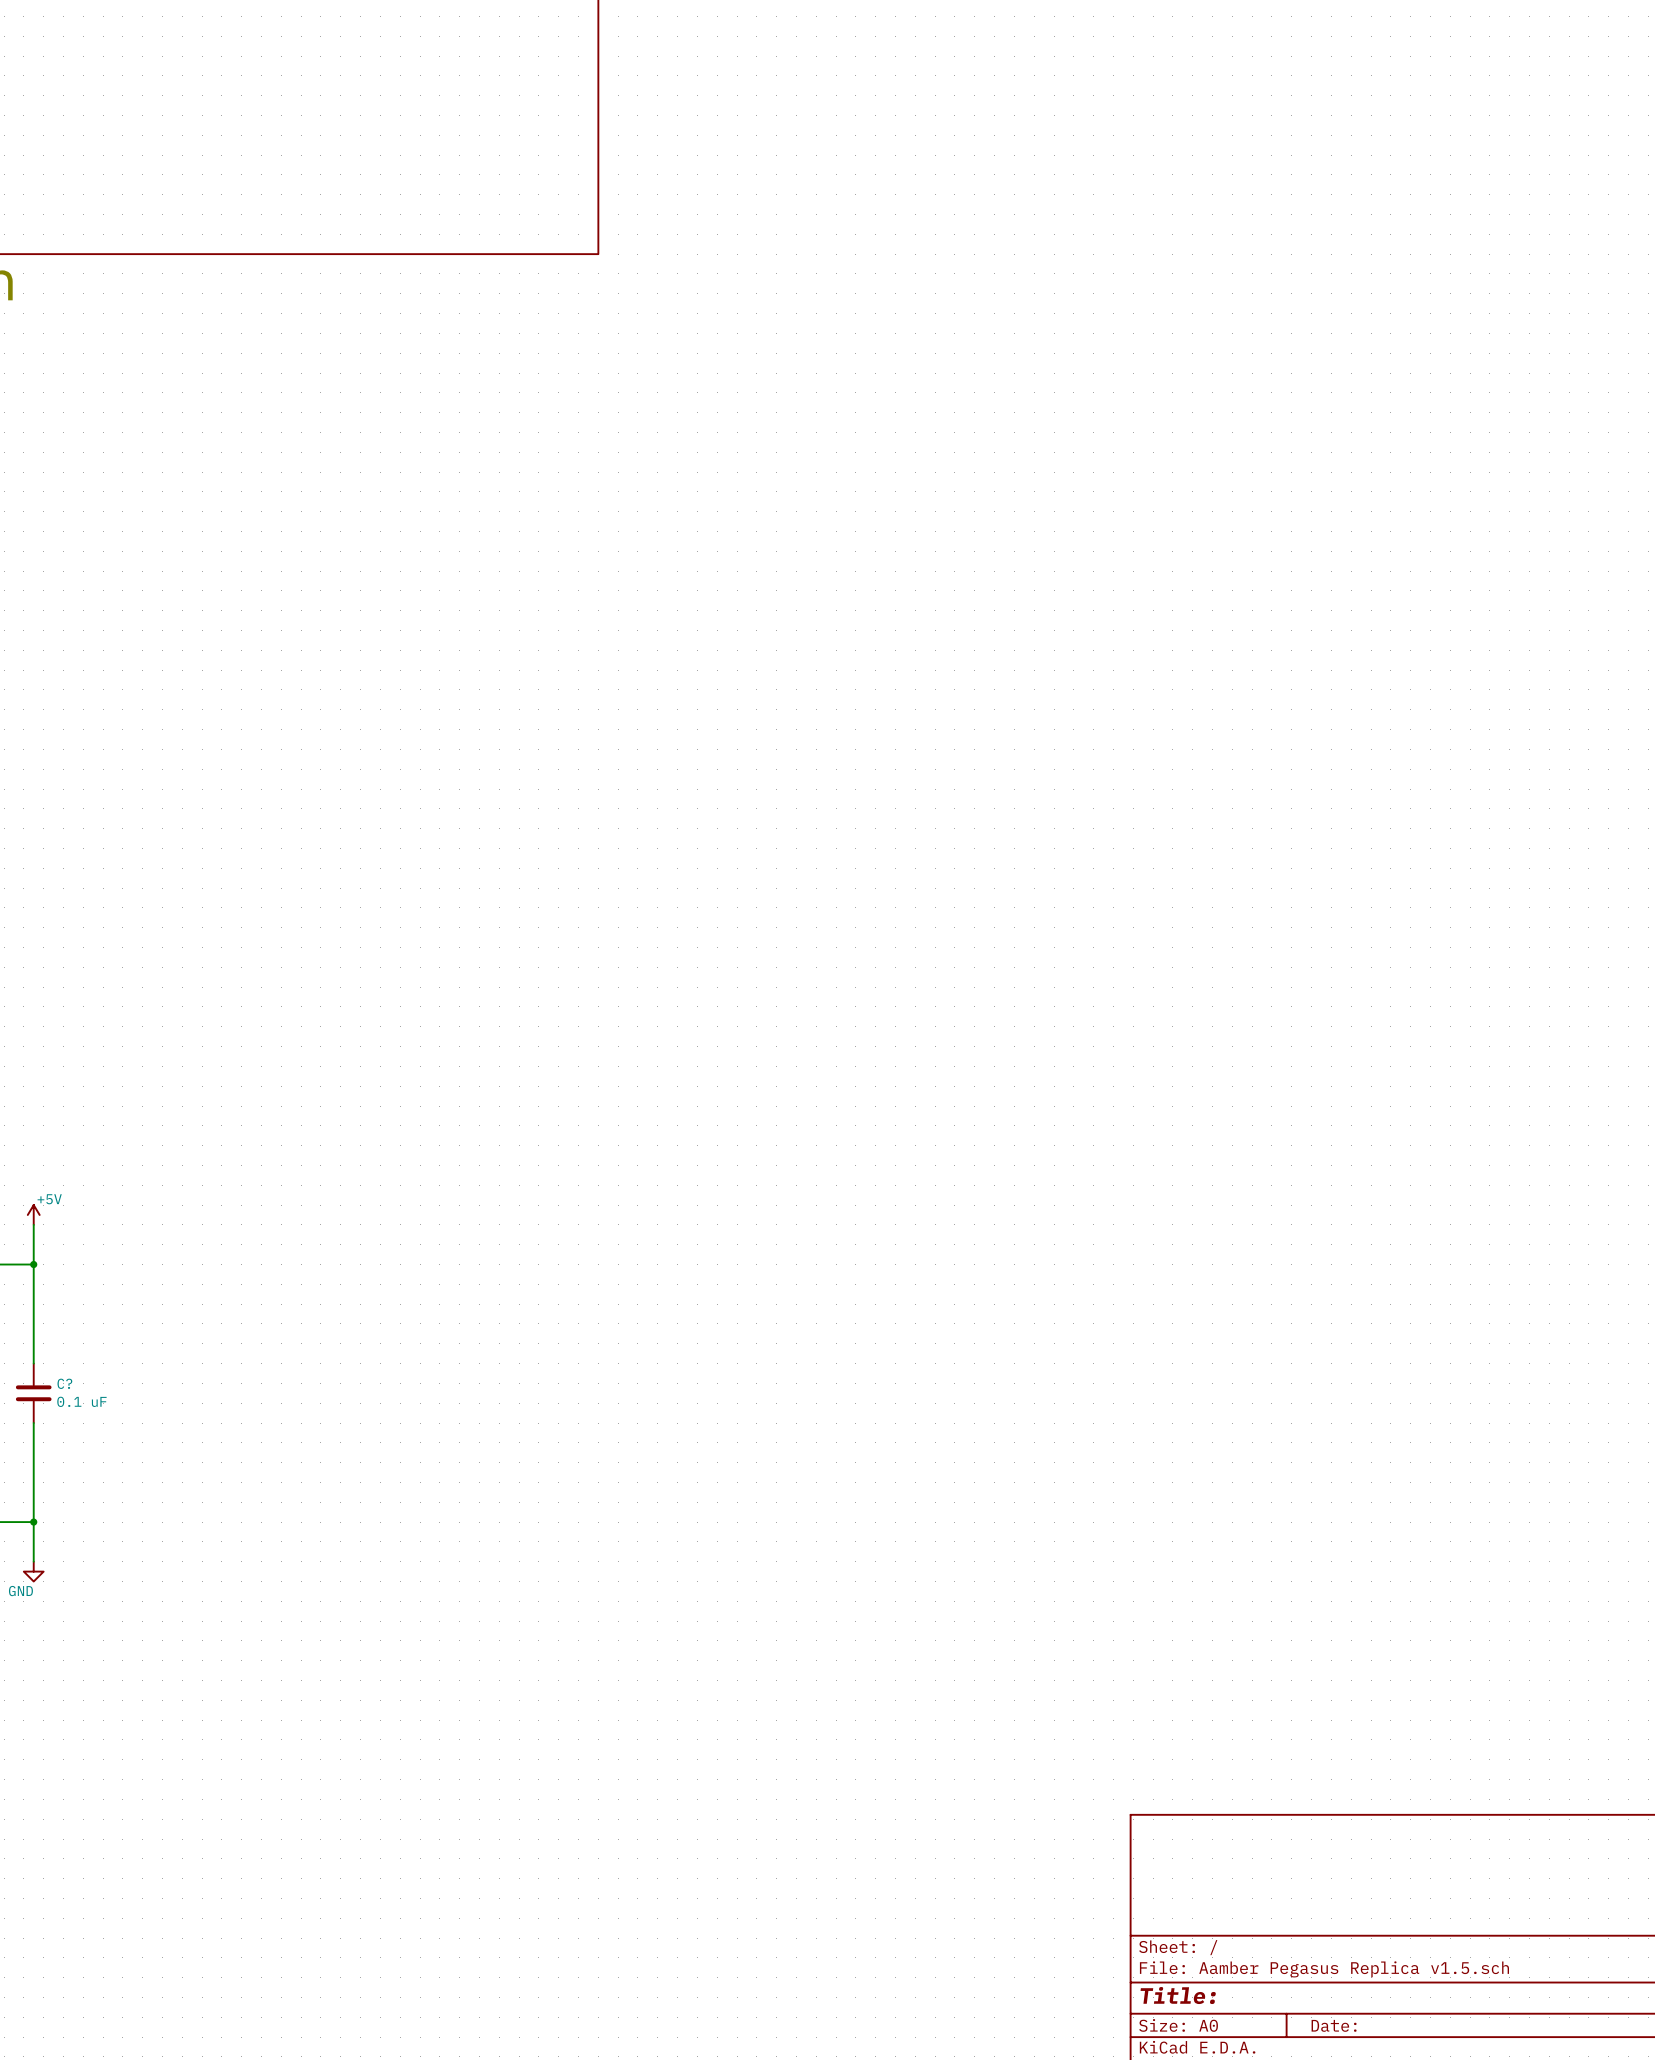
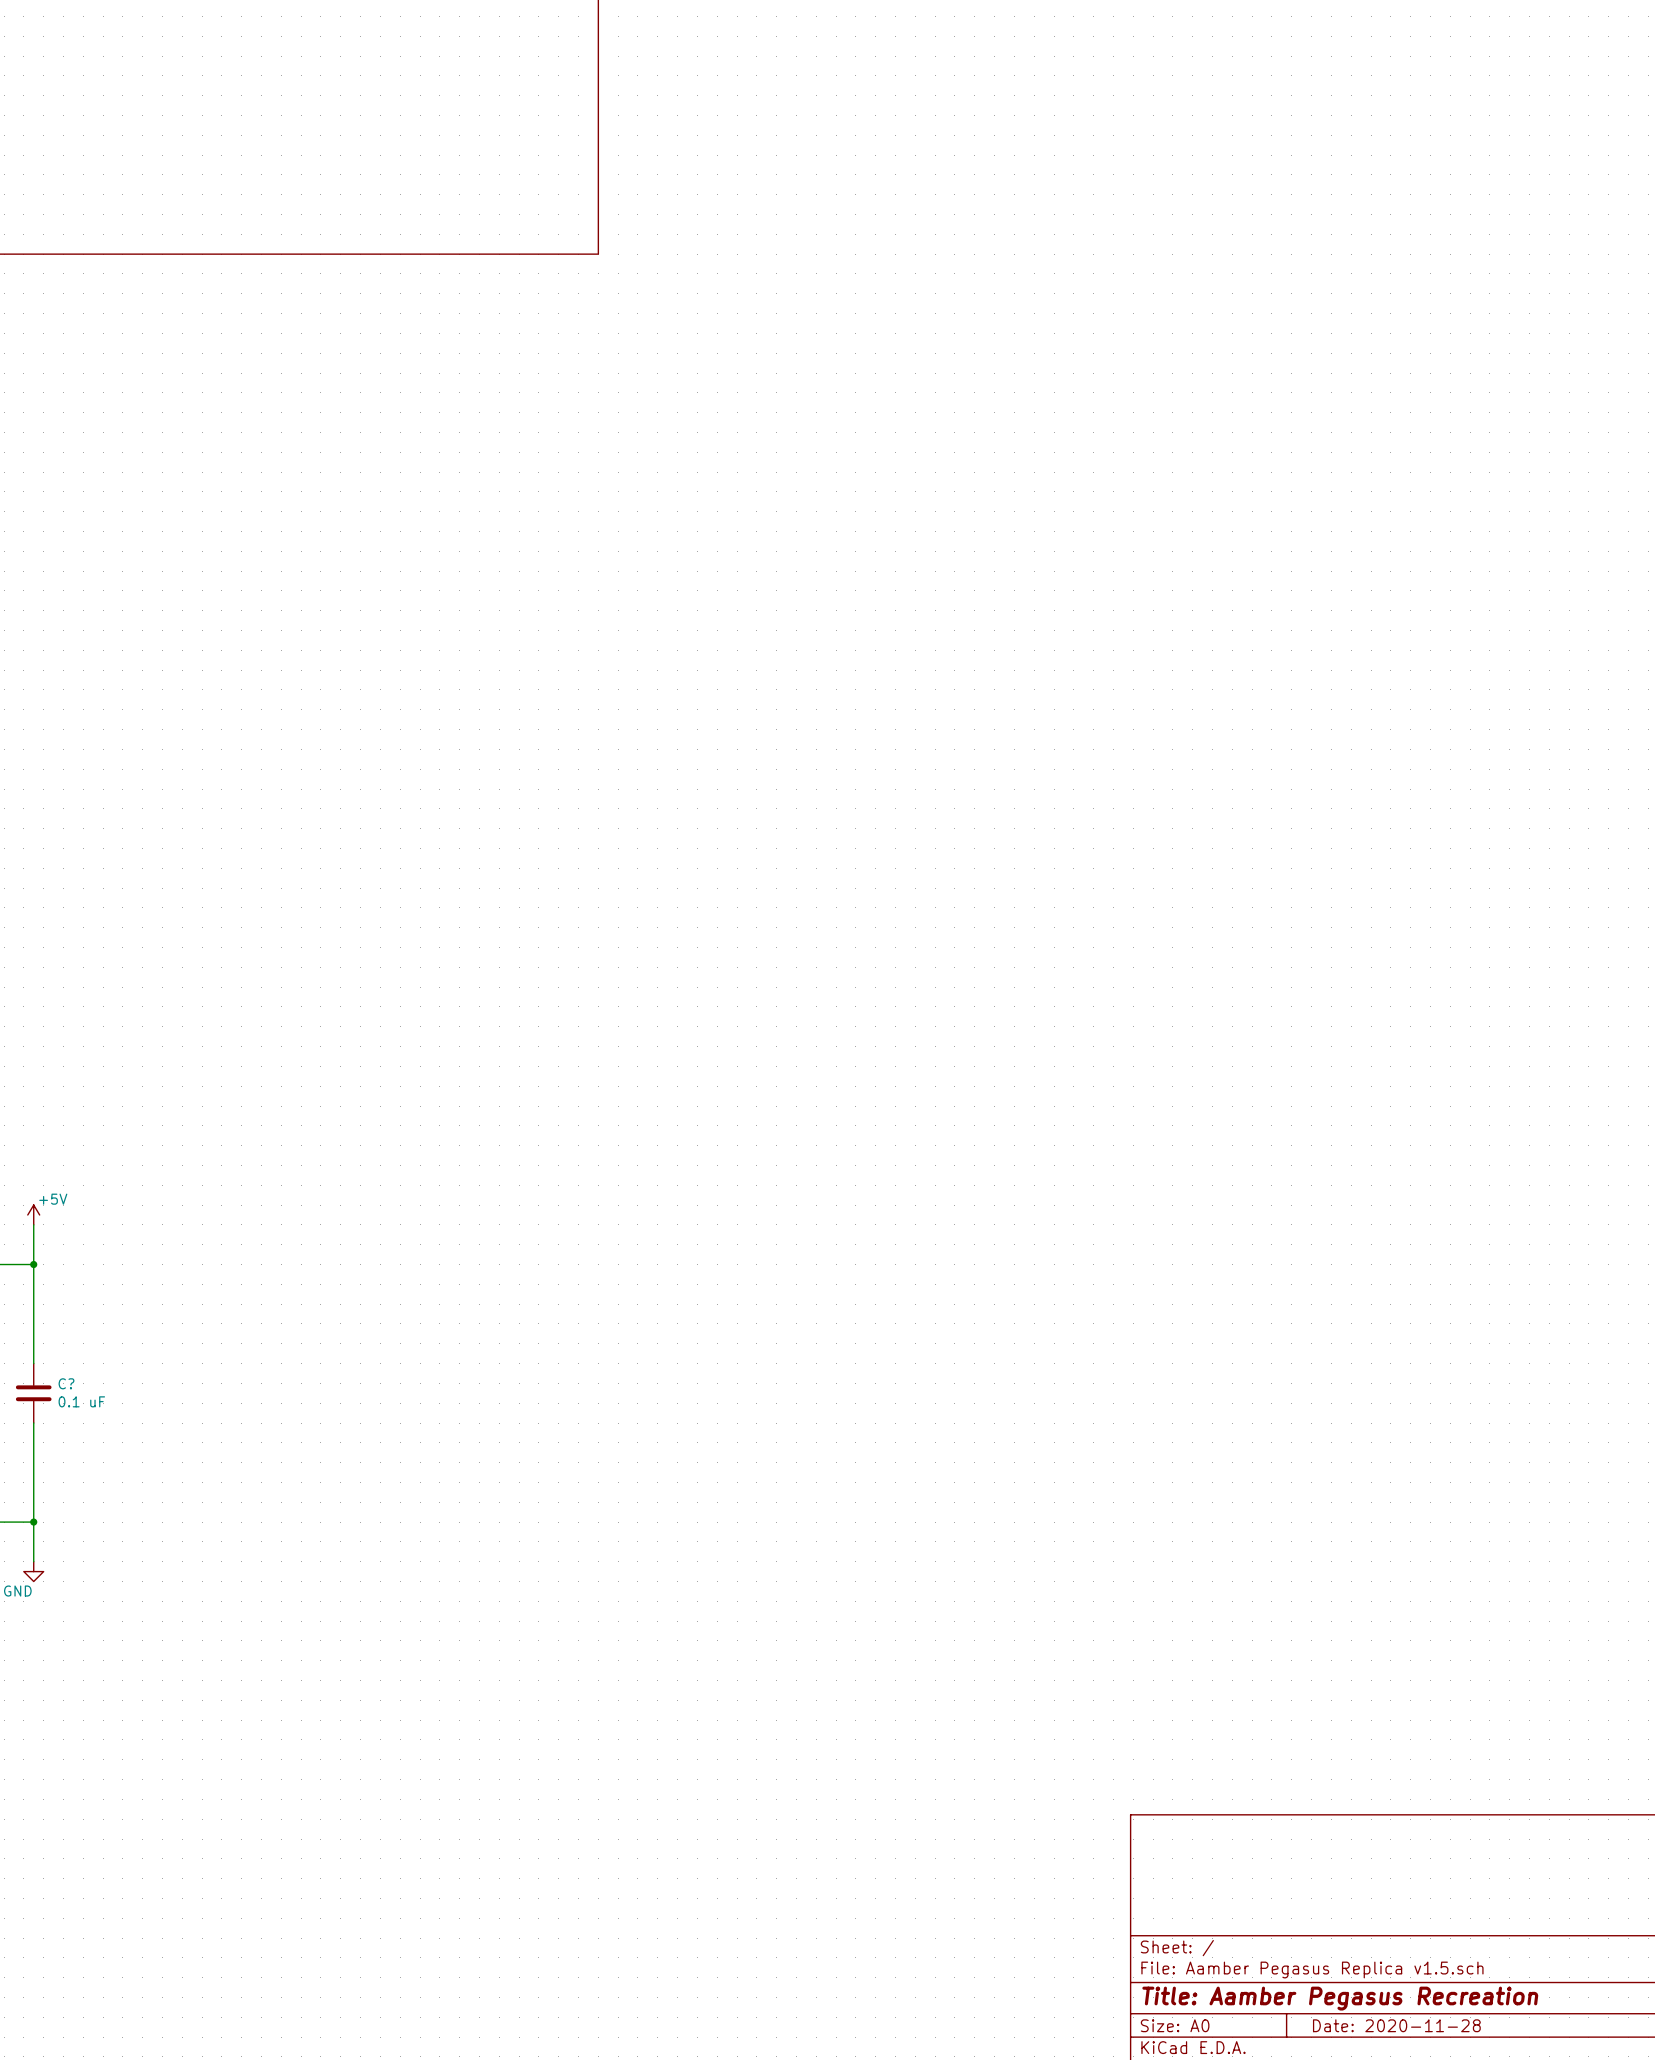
title block: Title: (1178, 1995) -> Title: Aamber Pegasus Recreation (1340, 1998)
title block: Date: (1334, 2025) -> Date: 2020-11-28 (1396, 2025)

